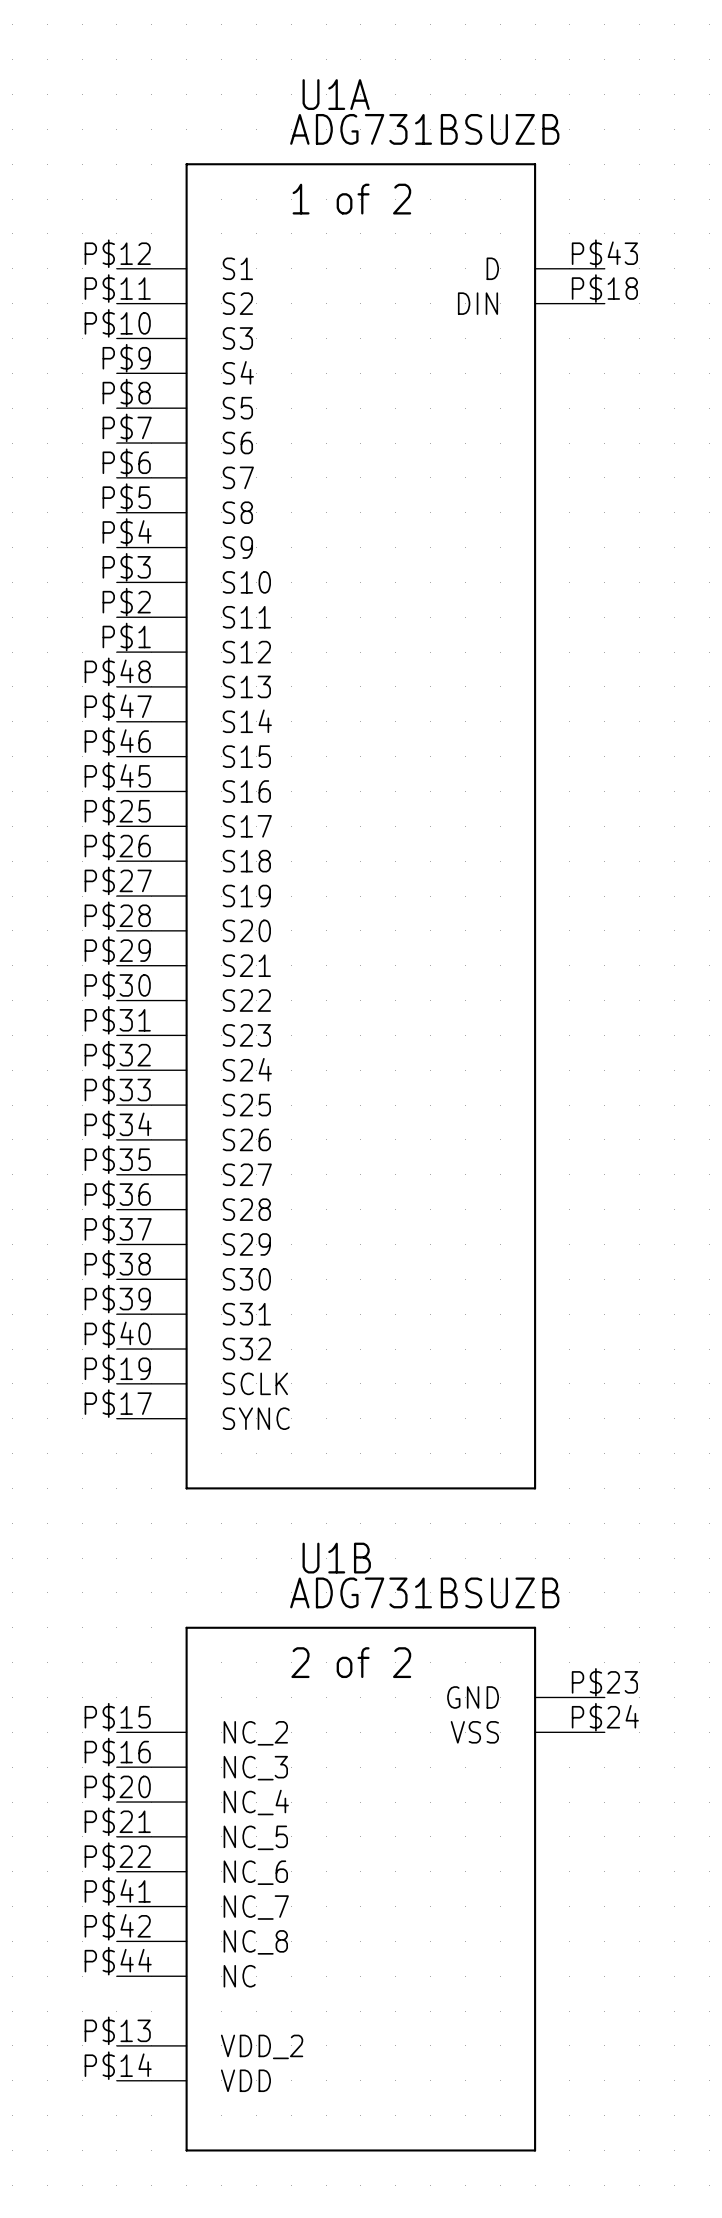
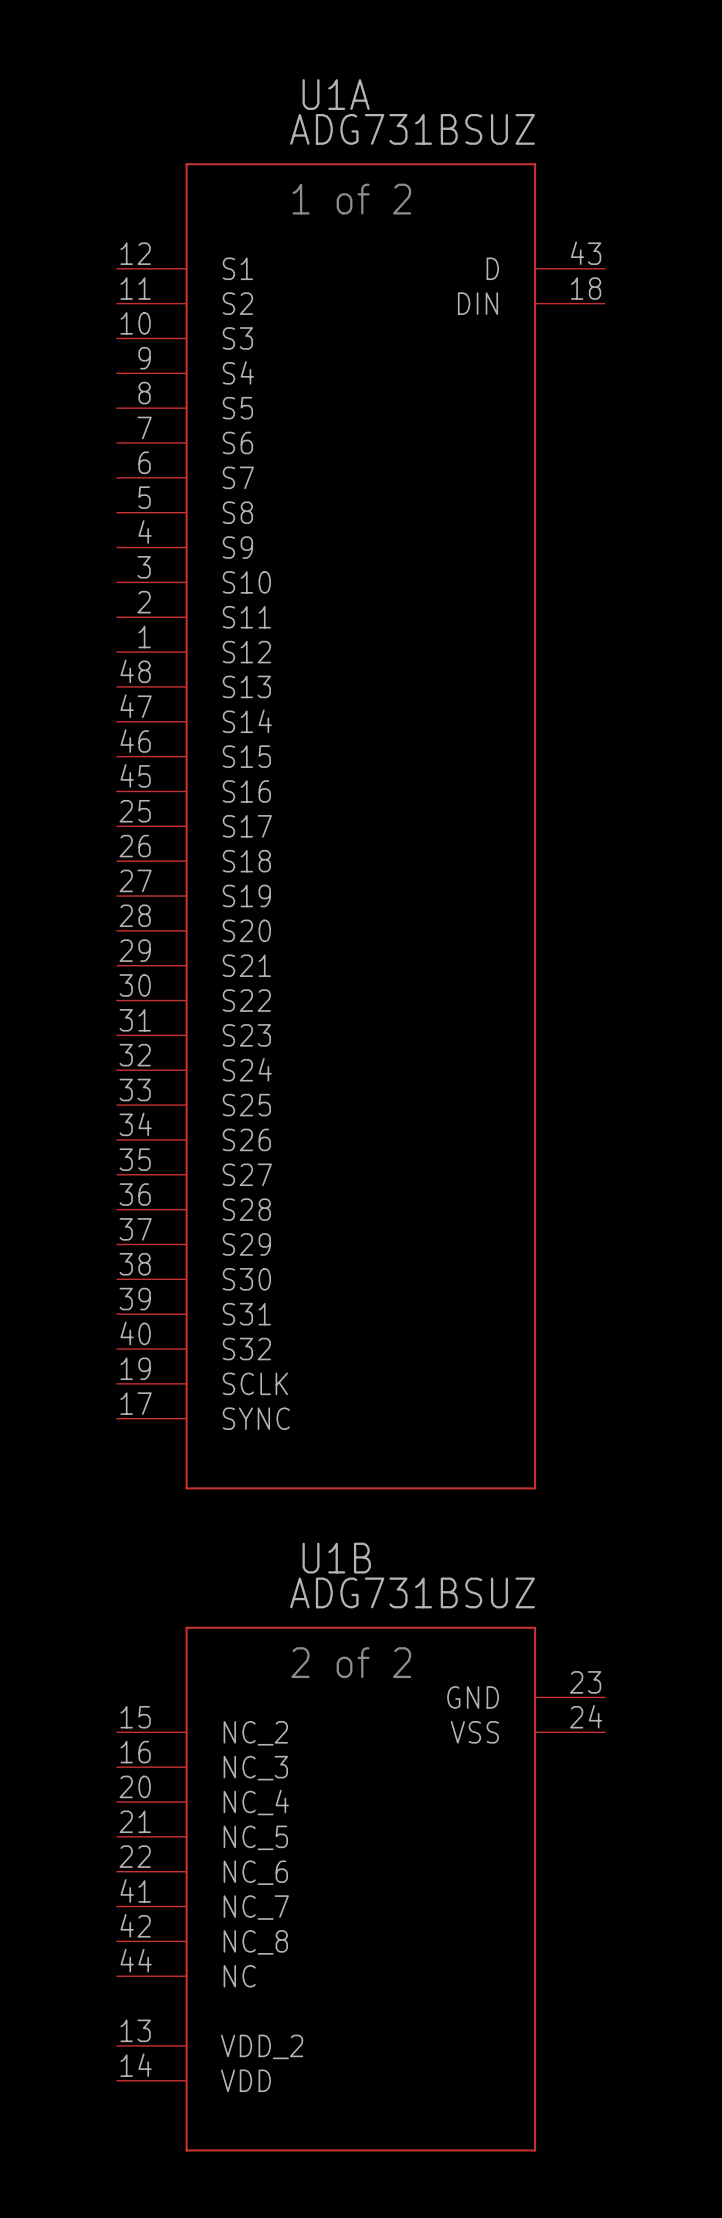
U1A value: ADG731BSUZB (424, 129) -> ADG731BSUZ (412, 129)
U1A symbol: [116, 163, 605, 1490] -> [116, 163, 605, 1490]
U1B value: ADG731BSUZB (424, 1592) -> ADG731BSUZ (412, 1592)
U1B symbol: [116, 1626, 605, 2152] -> [116, 1626, 605, 2152]

